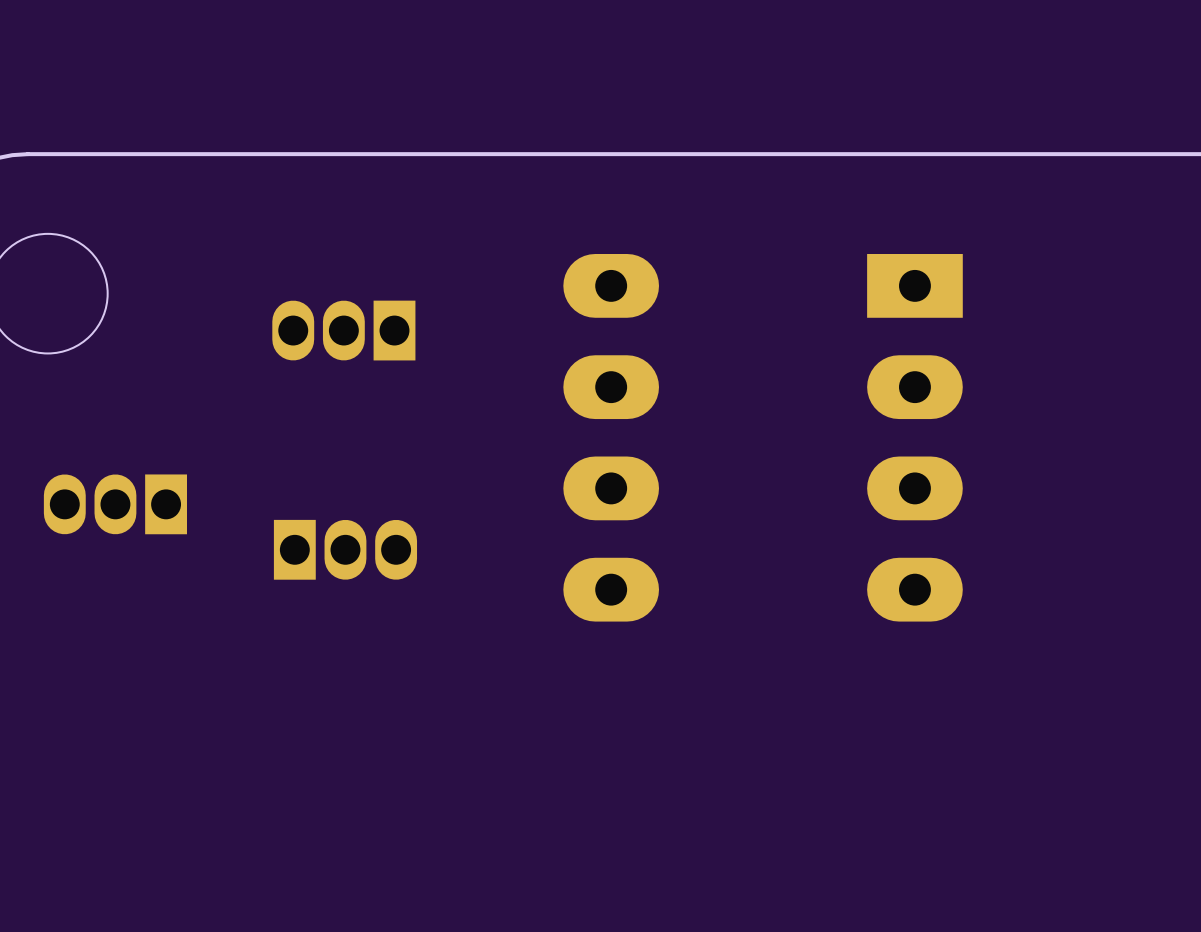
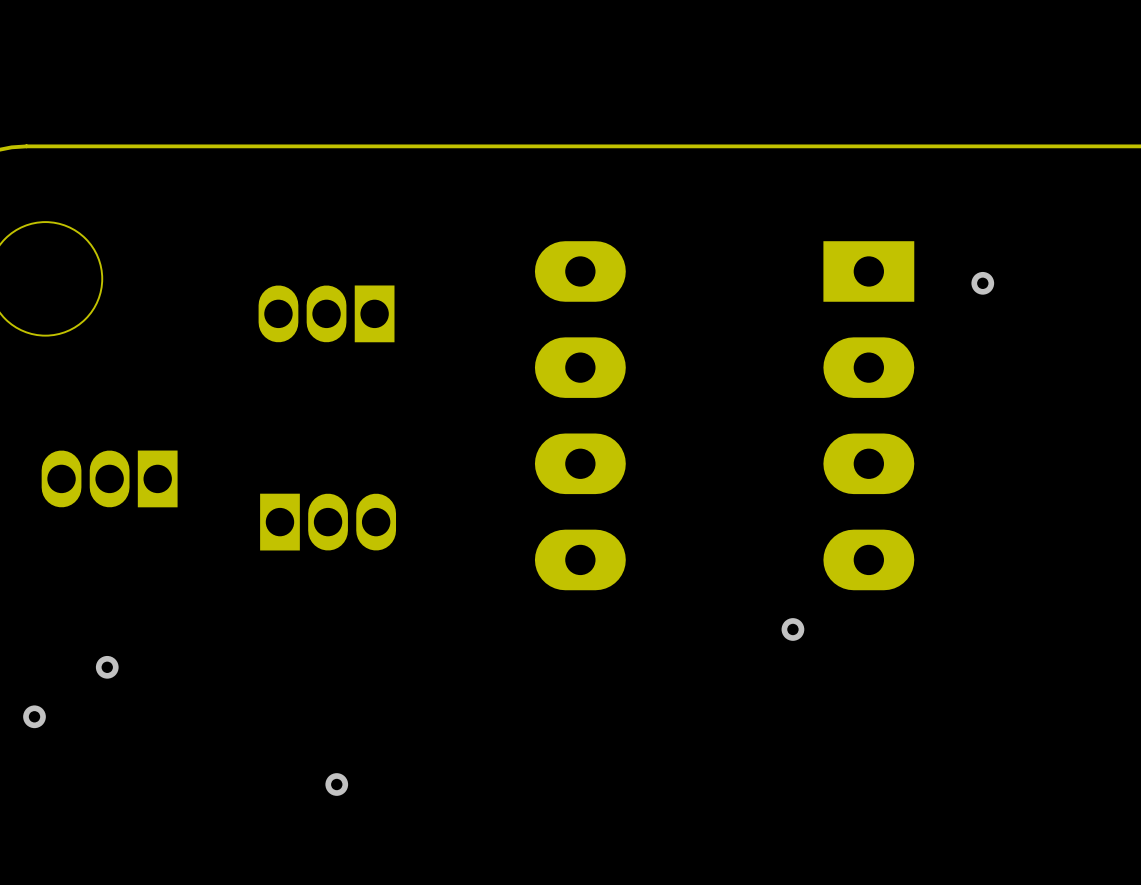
via: none -> (982, 283)
via: none -> (792, 629)
via: none -> (107, 667)
via: none -> (34, 716)
via: none -> (336, 784)

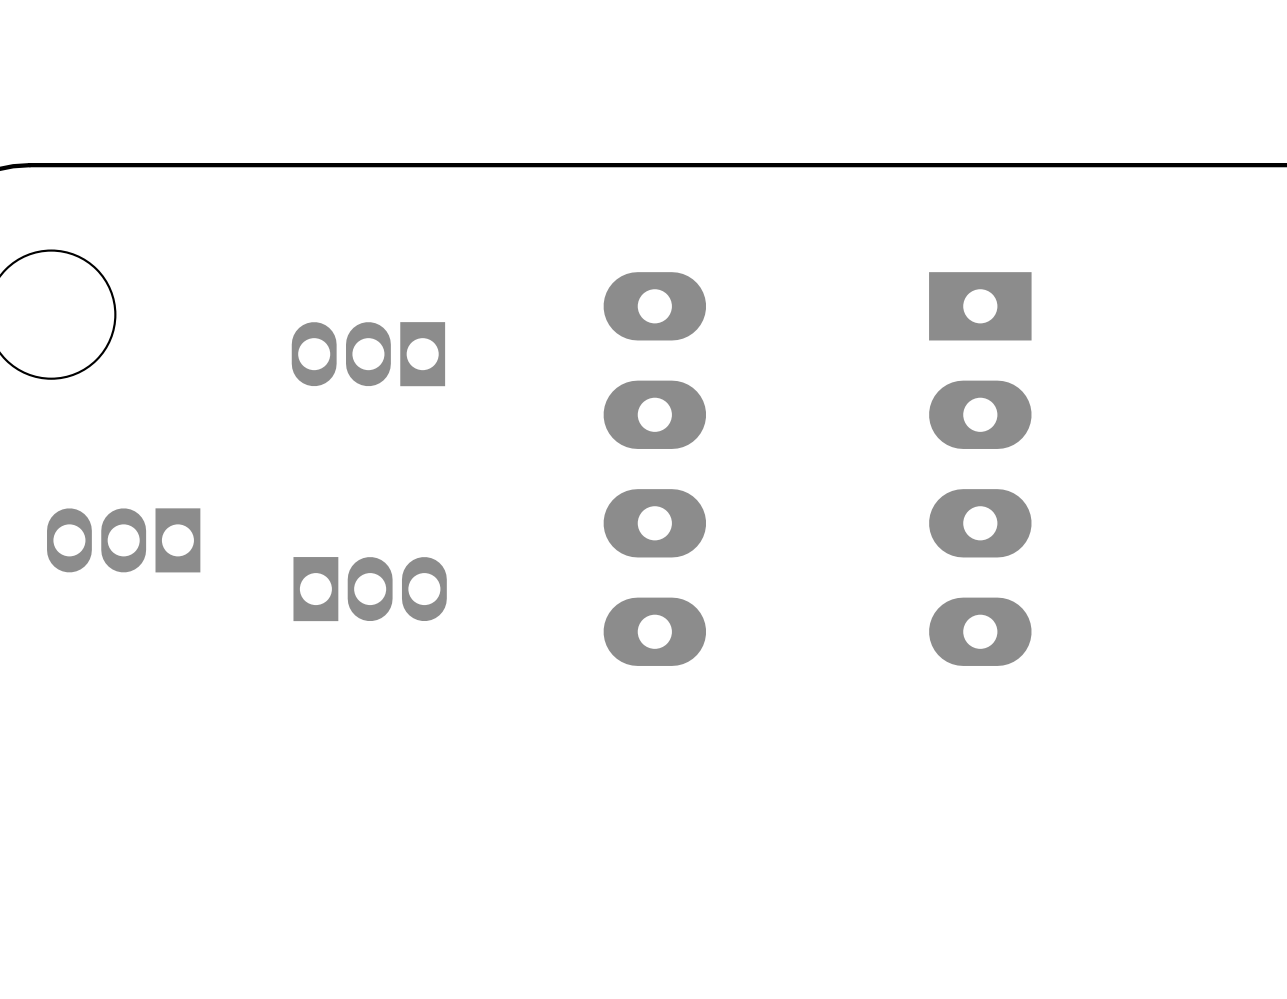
via: (982, 283) -> none
via: (792, 629) -> none
via: (107, 667) -> none
via: (34, 716) -> none
via: (336, 784) -> none

